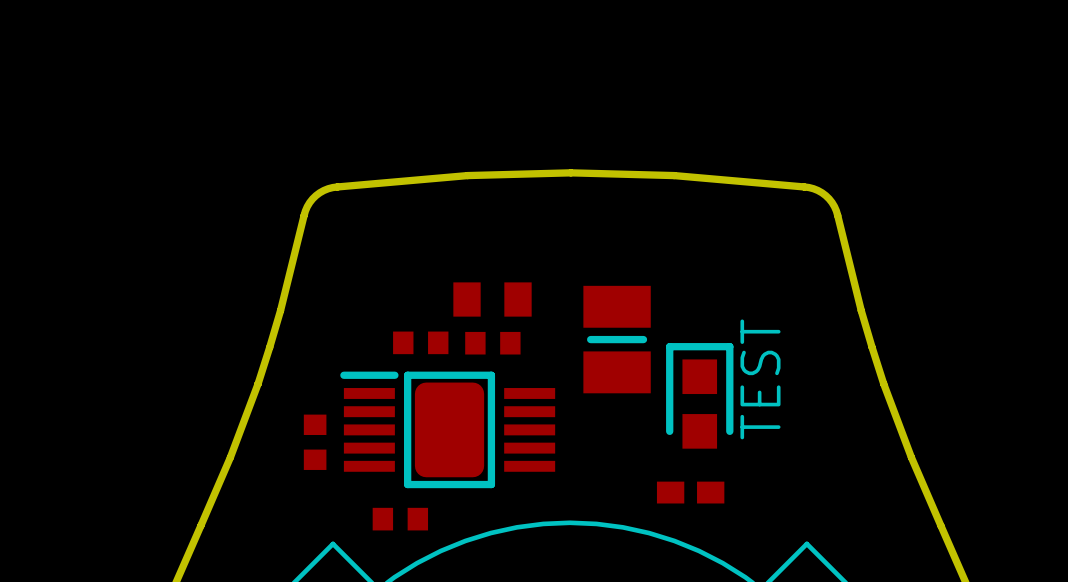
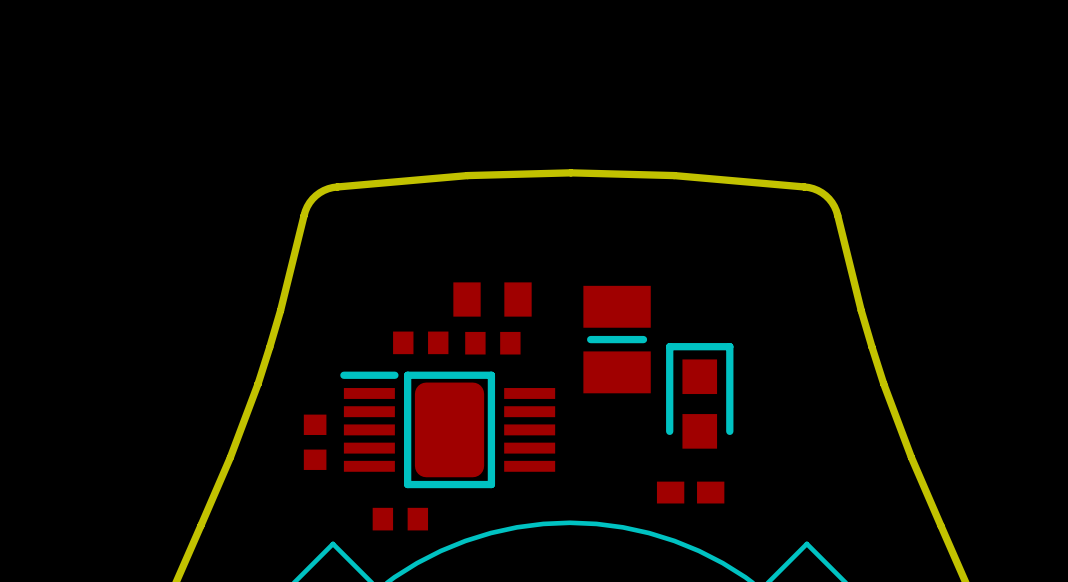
text: TEST (760, 379) -> none

